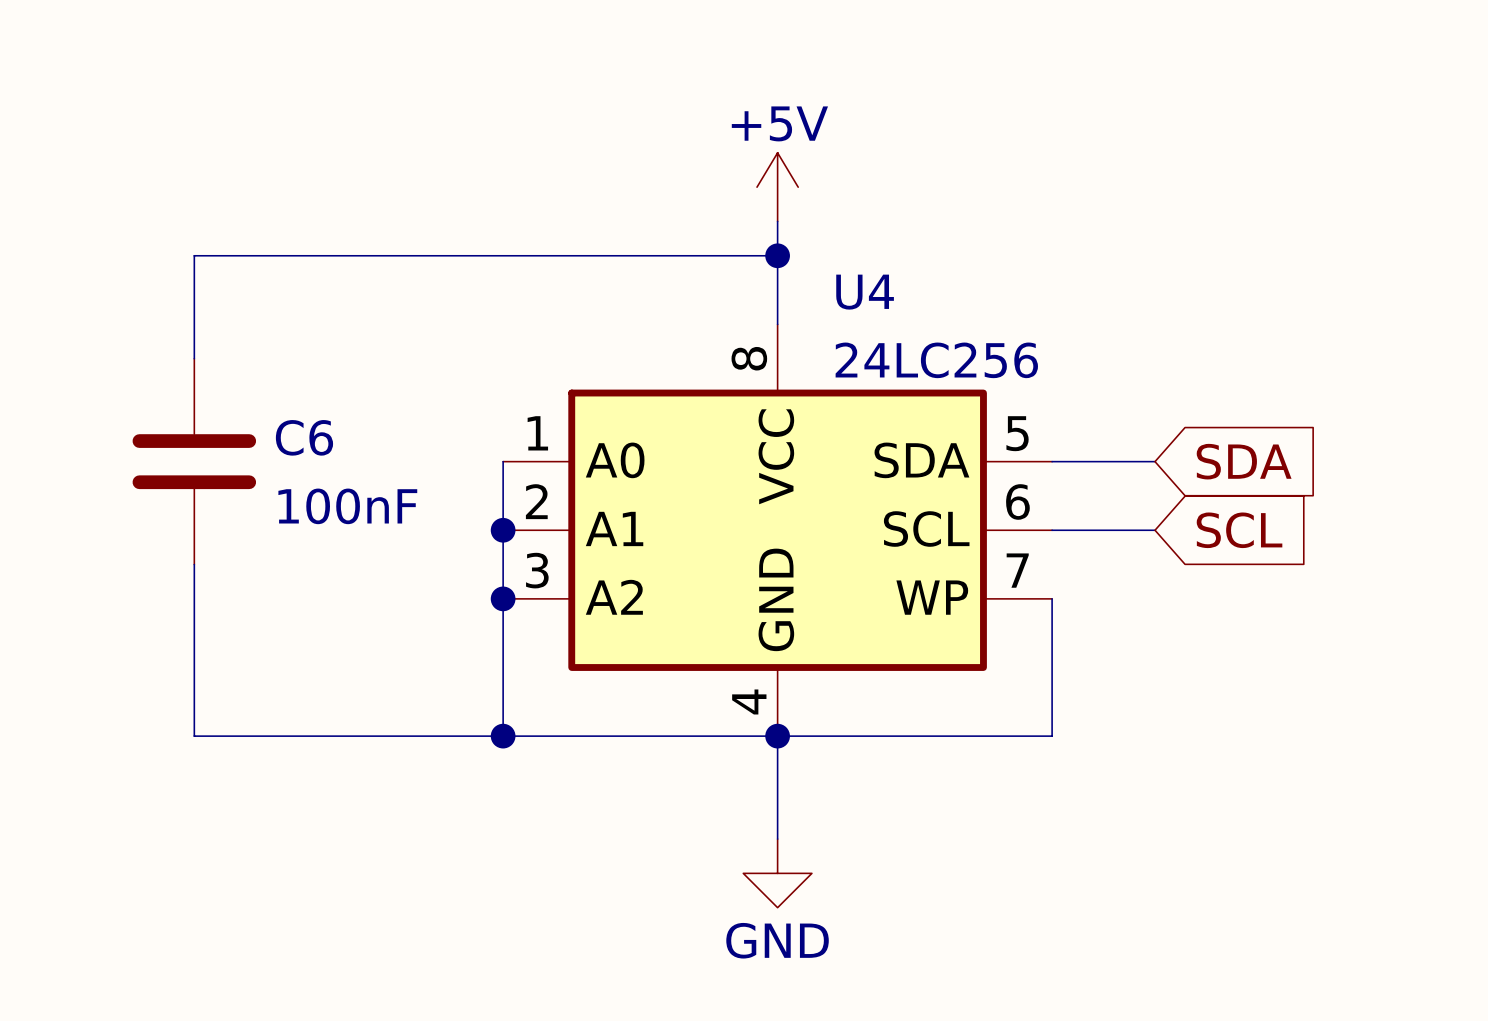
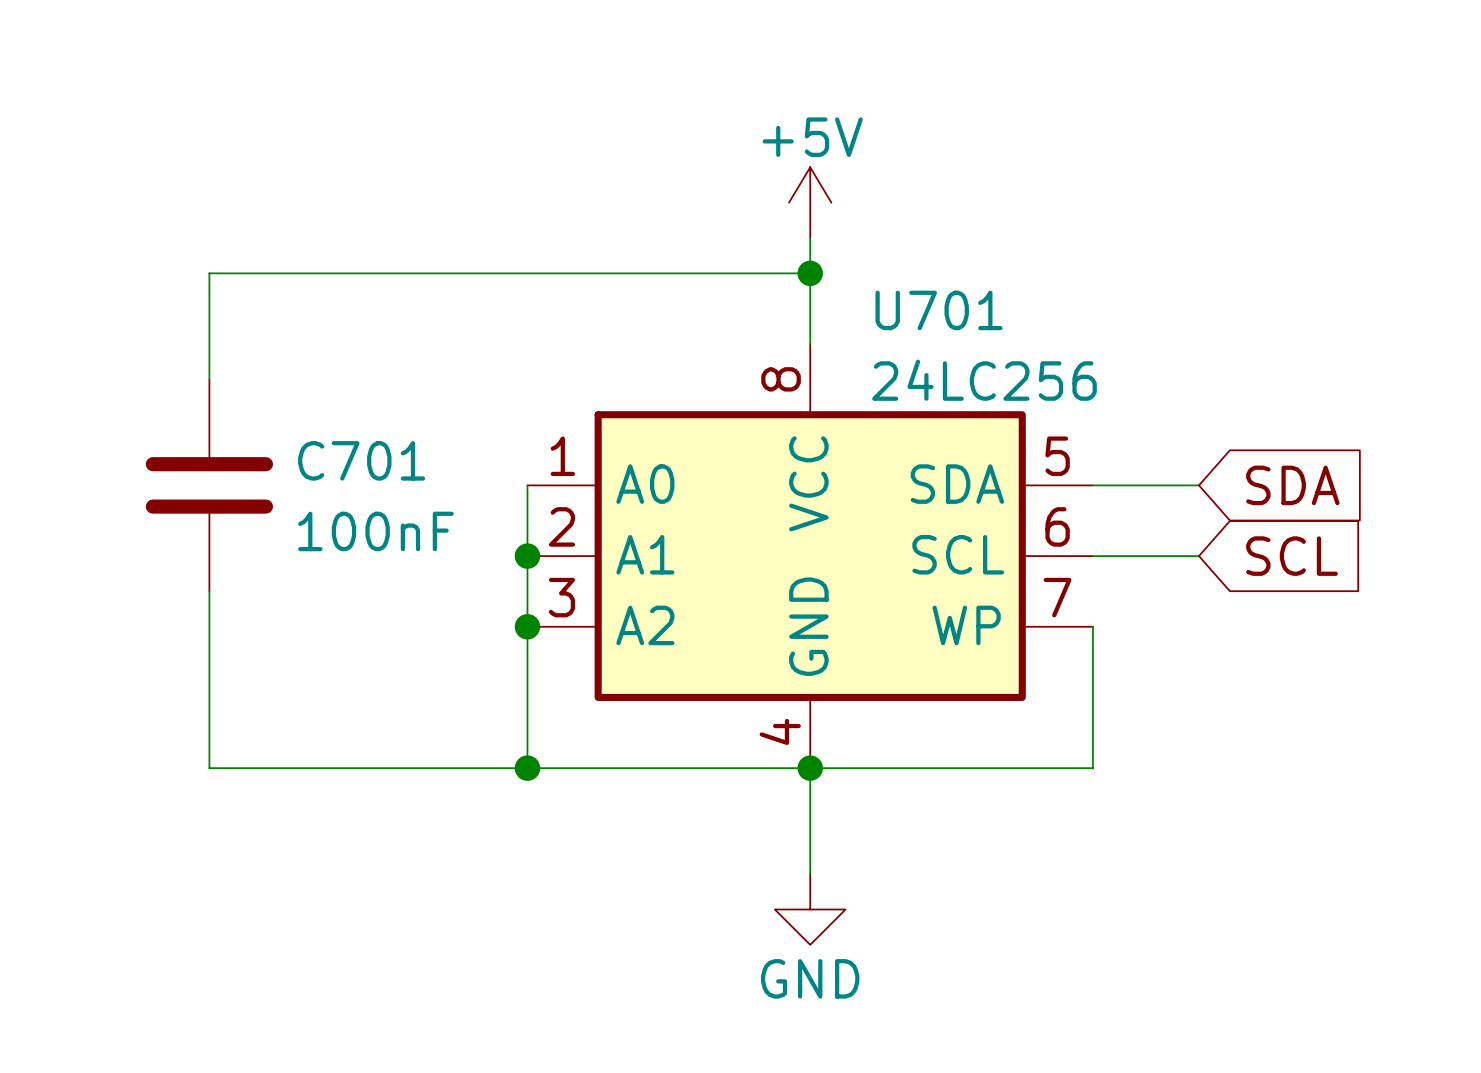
U4 name: U4 (865, 292) -> U701 (939, 310)
C6 name: C6 (304, 437) -> C701 (361, 460)

